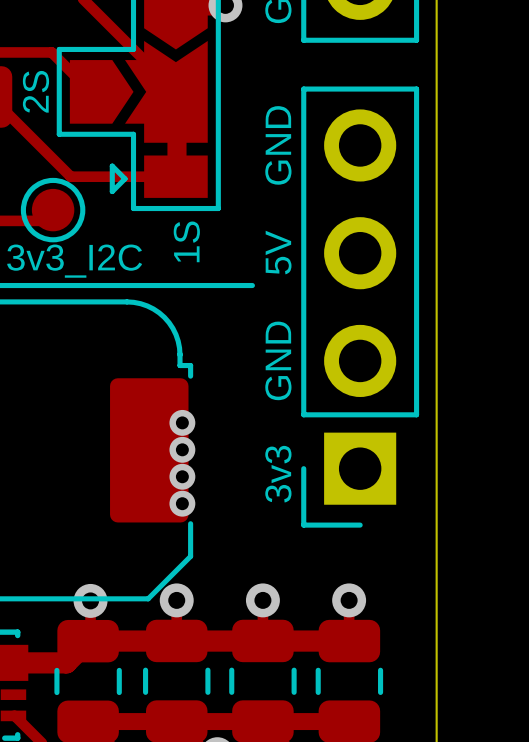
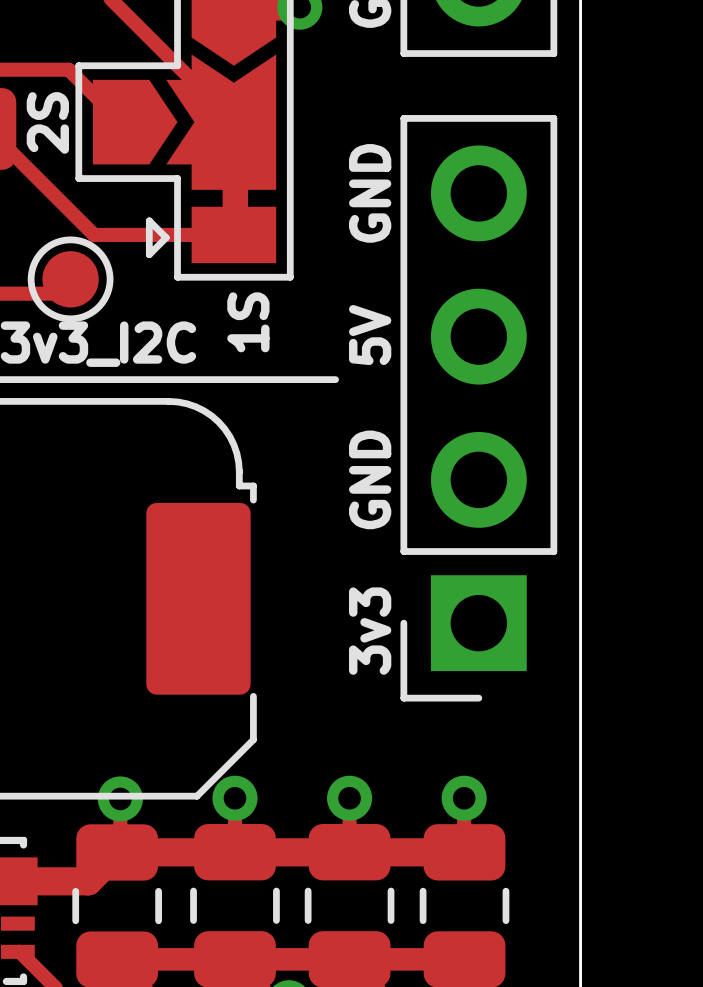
via: (182, 422) -> none
via: (182, 449) -> none
via: (182, 476) -> none
via: (182, 503) -> none

